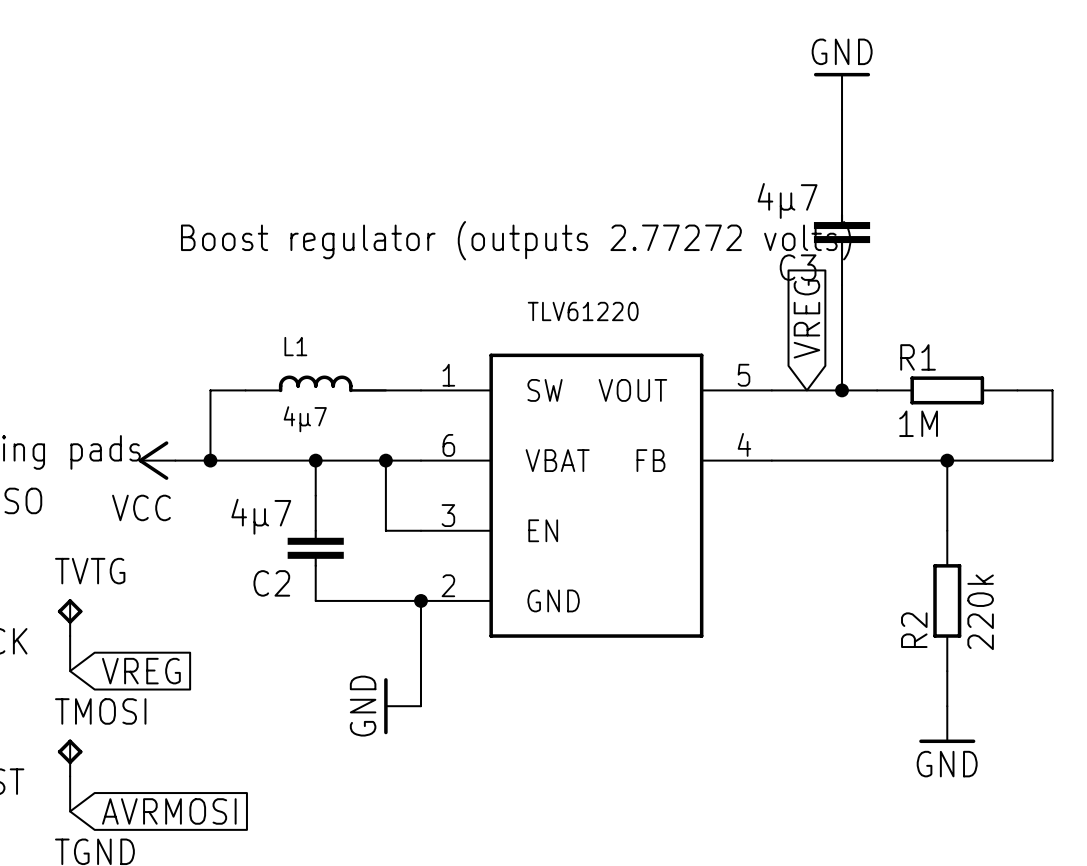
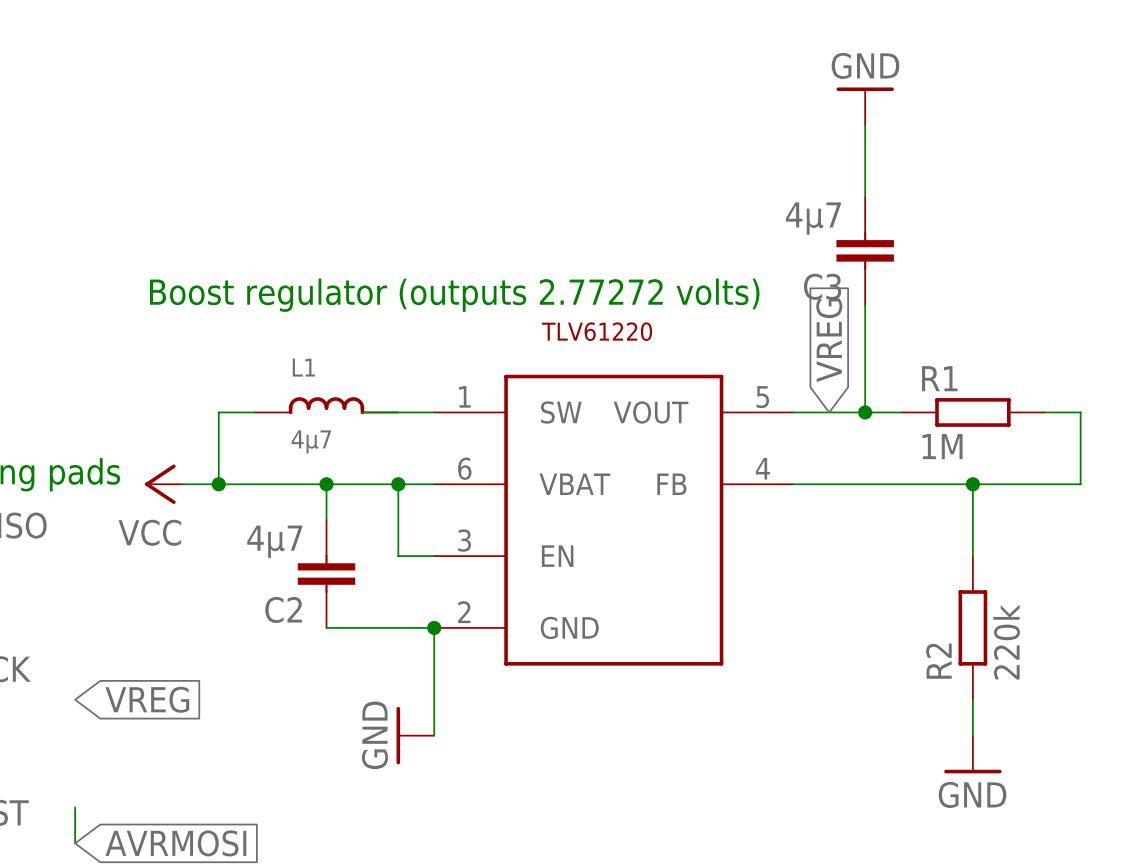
text position: Boost regulator (outputs 2.77272 volts) (516, 240) -> Boost regulator (outputs 2.77272 volts) (454, 295)
TVTG: (70, 617) -> none
wire: (70, 636) (70, 671) -> none
TMOSI: (70, 757) -> none

